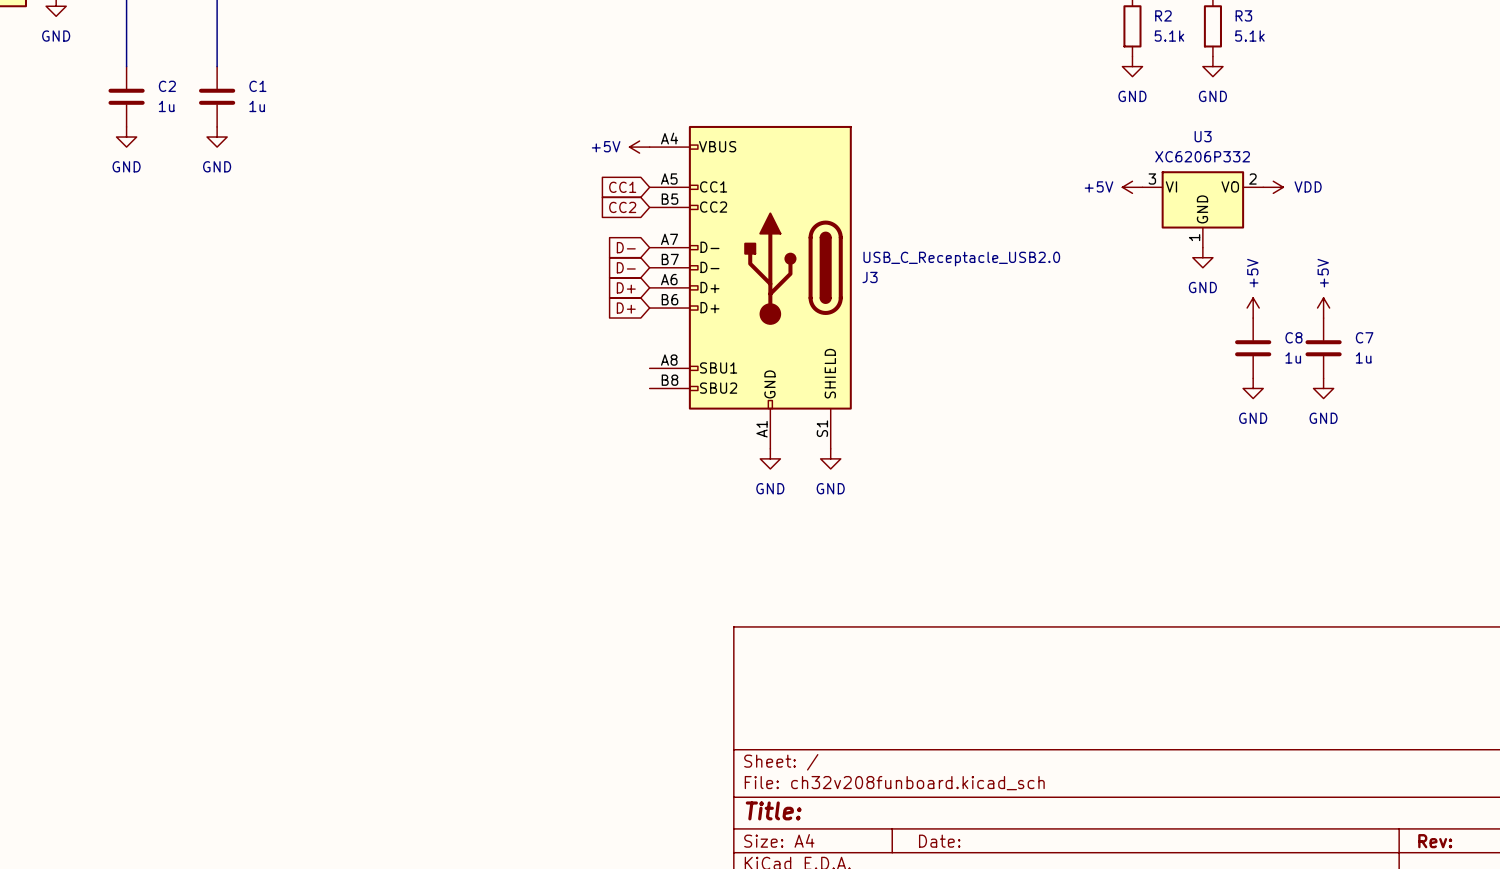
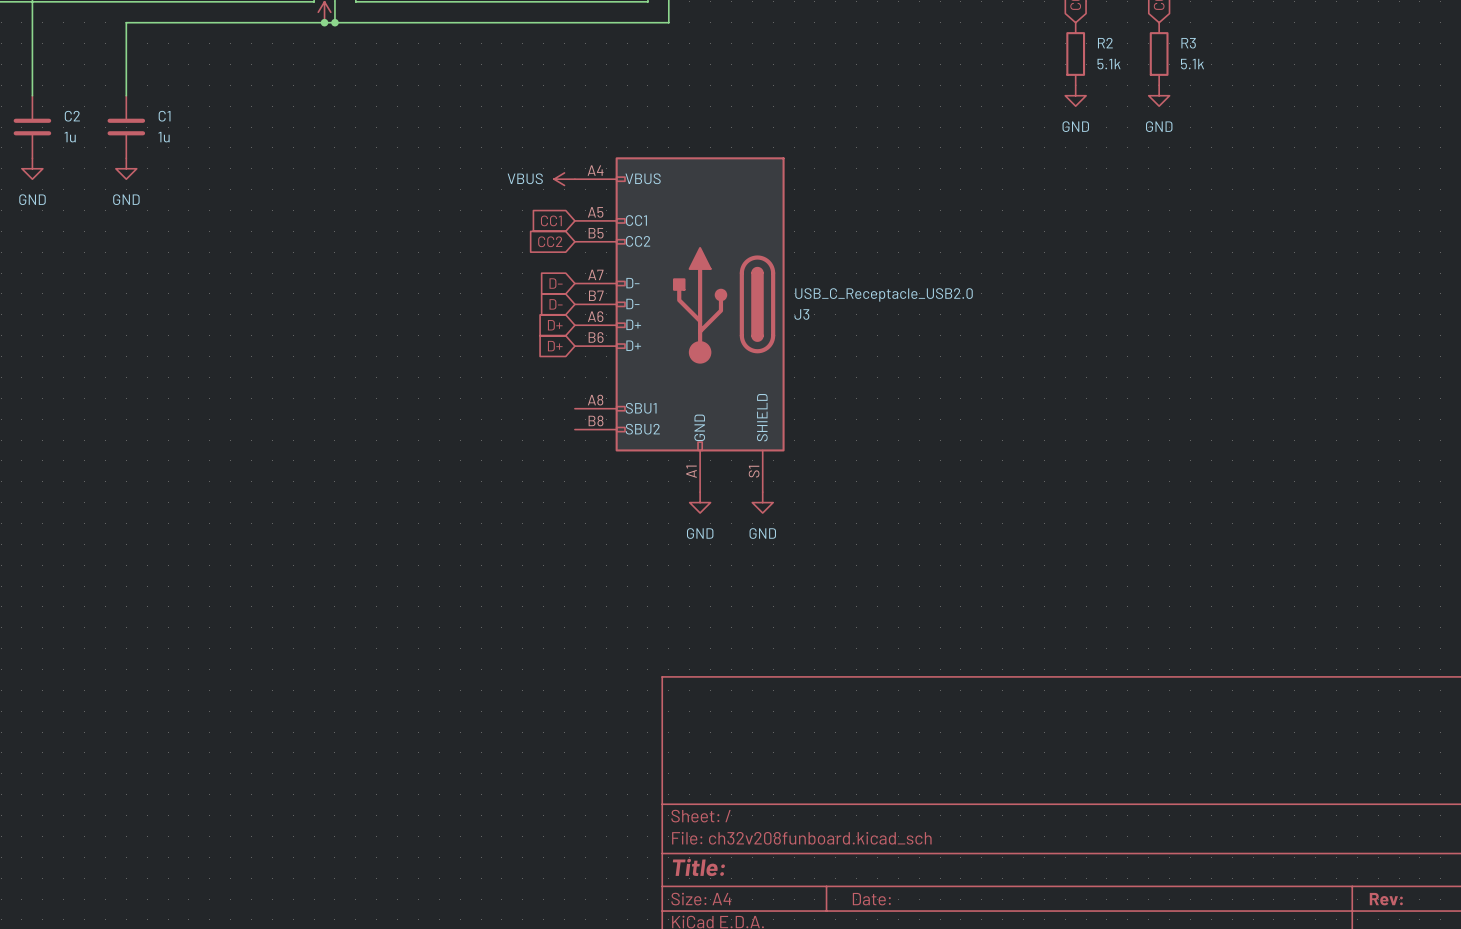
power symbol: +5V (639, 147) -> VBUS (564, 179)
power symbol: +5V (1132, 187) -> none
power symbol: VDD (1273, 187) -> none
U3: XC6206P332 (1202, 209) -> none
power symbol: GND (1202, 257) -> none
power symbol: +5V (1253, 308) -> none
power symbol: +5V (1323, 308) -> none
C8: 1u (1253, 348) -> none
C7: 1u (1323, 348) -> none
power symbol: GND (1253, 388) -> none
power symbol: GND (1323, 388) -> none

